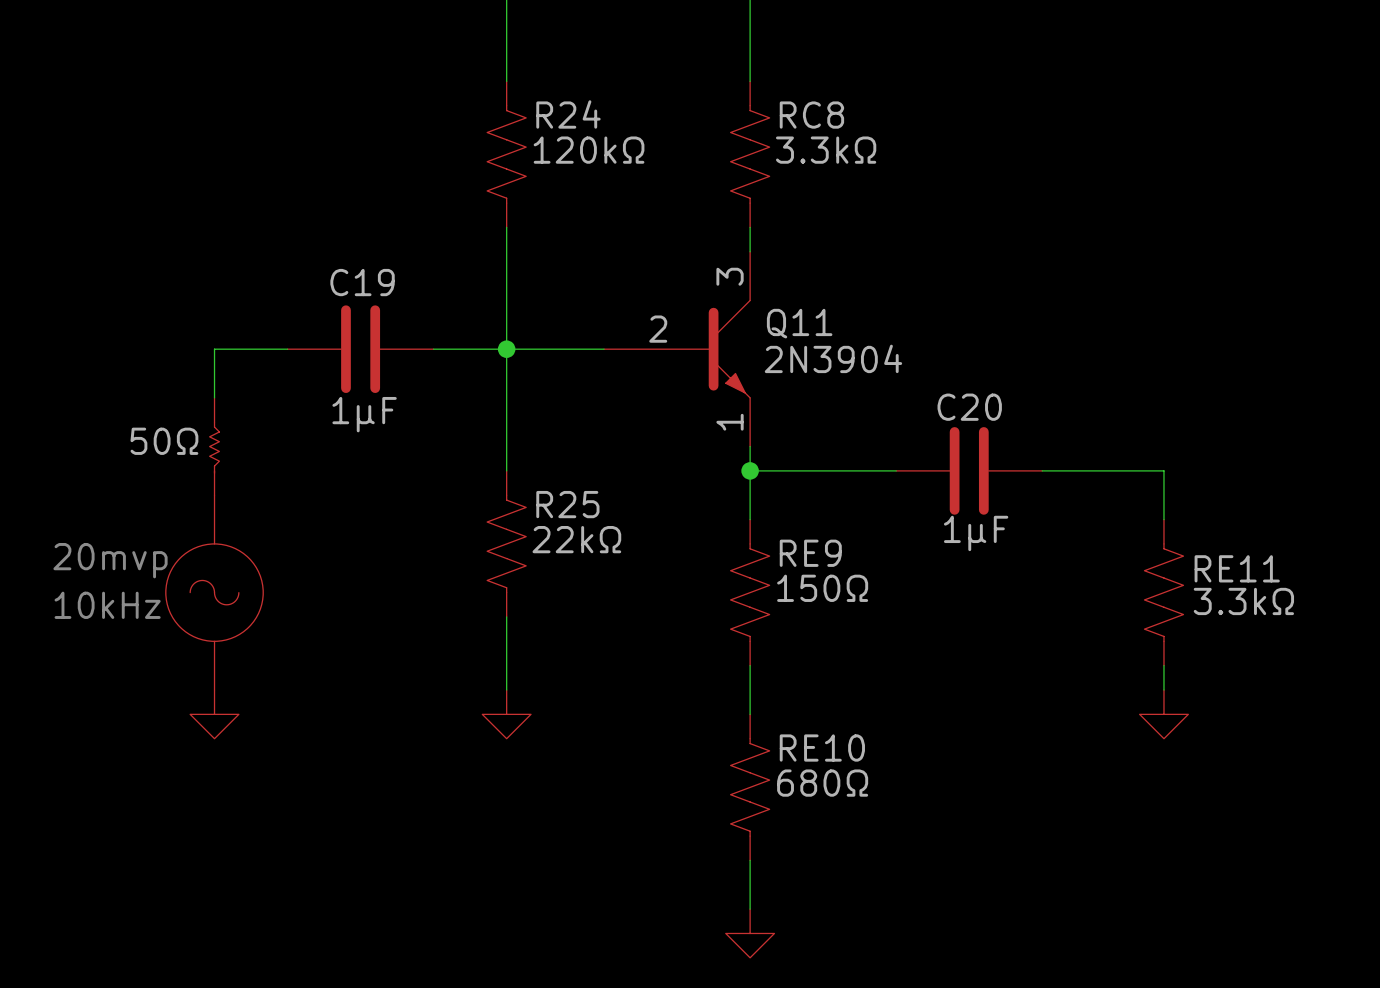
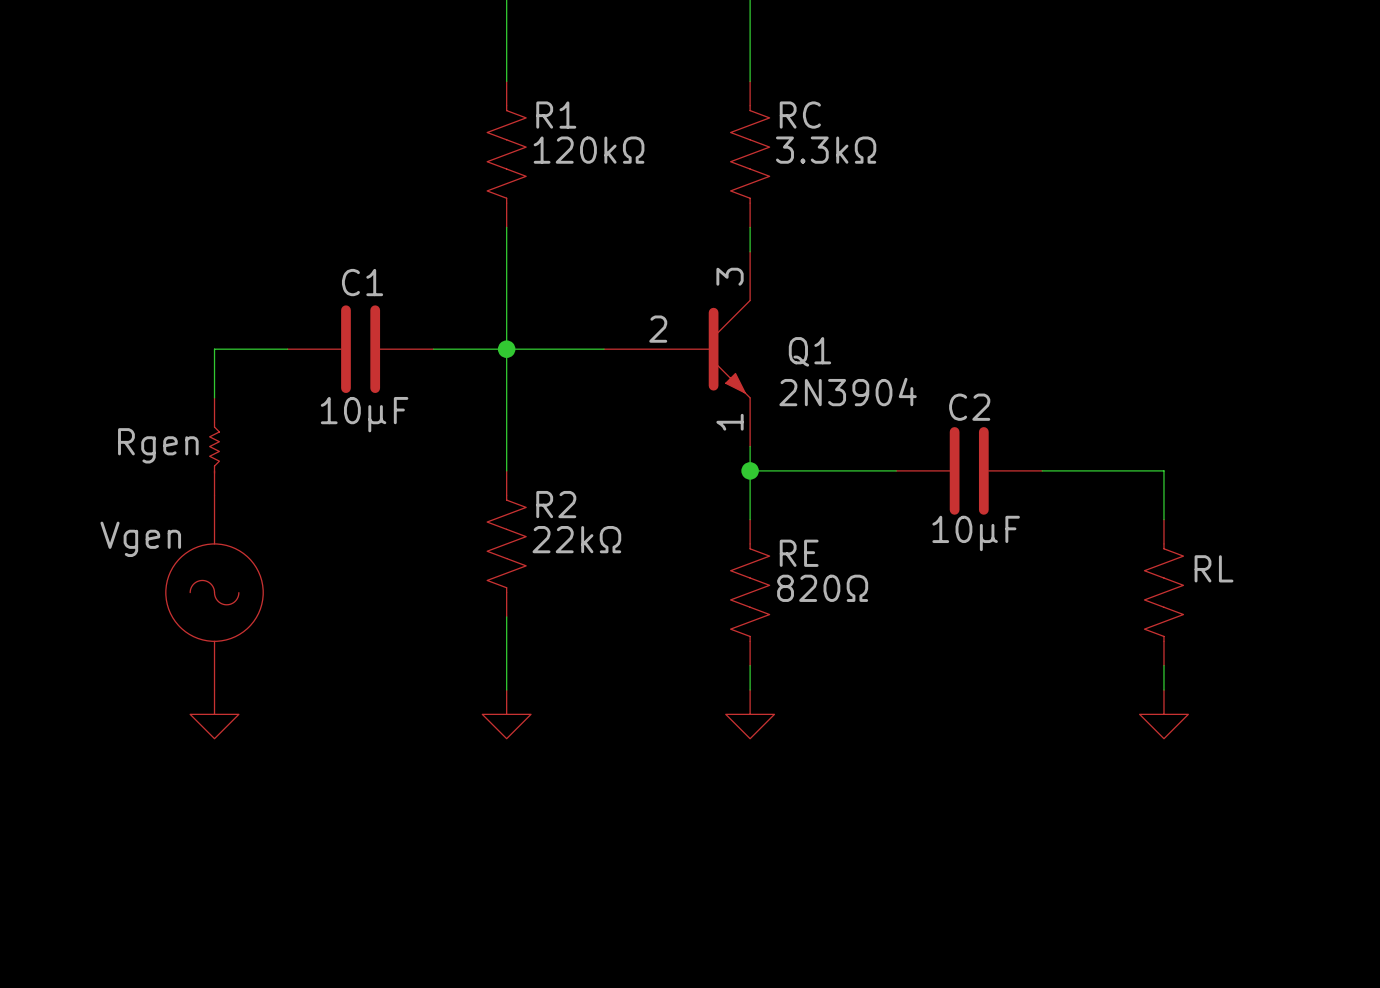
R24 name: R24 (568, 114) -> R1 (556, 115)
RC8 name: RC8 (811, 115) -> RC (800, 115)
C19 name: C19 (362, 282) -> C1 (362, 282)
Q11 name: Q11 (799, 323) -> Q1 (809, 351)
Q11 value position: 2N3904 (833, 358) -> 2N3904 (848, 392)
C20 name: C20 (969, 407) -> C2 (969, 407)
C19 value: 1µF (364, 414) -> 10µF (364, 414)
part value: 50Ω (164, 441) -> Rgen (158, 445)
R25 name: R25 (567, 504) -> R2 (556, 504)
C20 value: 1µF (976, 533) -> 10µF (976, 533)
part value: none -> Vgen (140, 539)
RE9 name: RE9 (810, 553) -> RE (799, 553)
text: 20mvp (110, 560) -> none
RE11 name: RE11 (1237, 568) -> RL (1214, 568)
RE9 value: 150Ω (822, 588) -> 820Ω (822, 588)
RE11 value: 3.3kΩ (1243, 601) -> none
text: 10kHz (107, 605) -> none
RE10: 680Ω (750, 787) -> none
wire: (750, 860) (750, 909) -> none
power symbol position: (750, 933) -> (750, 714)

